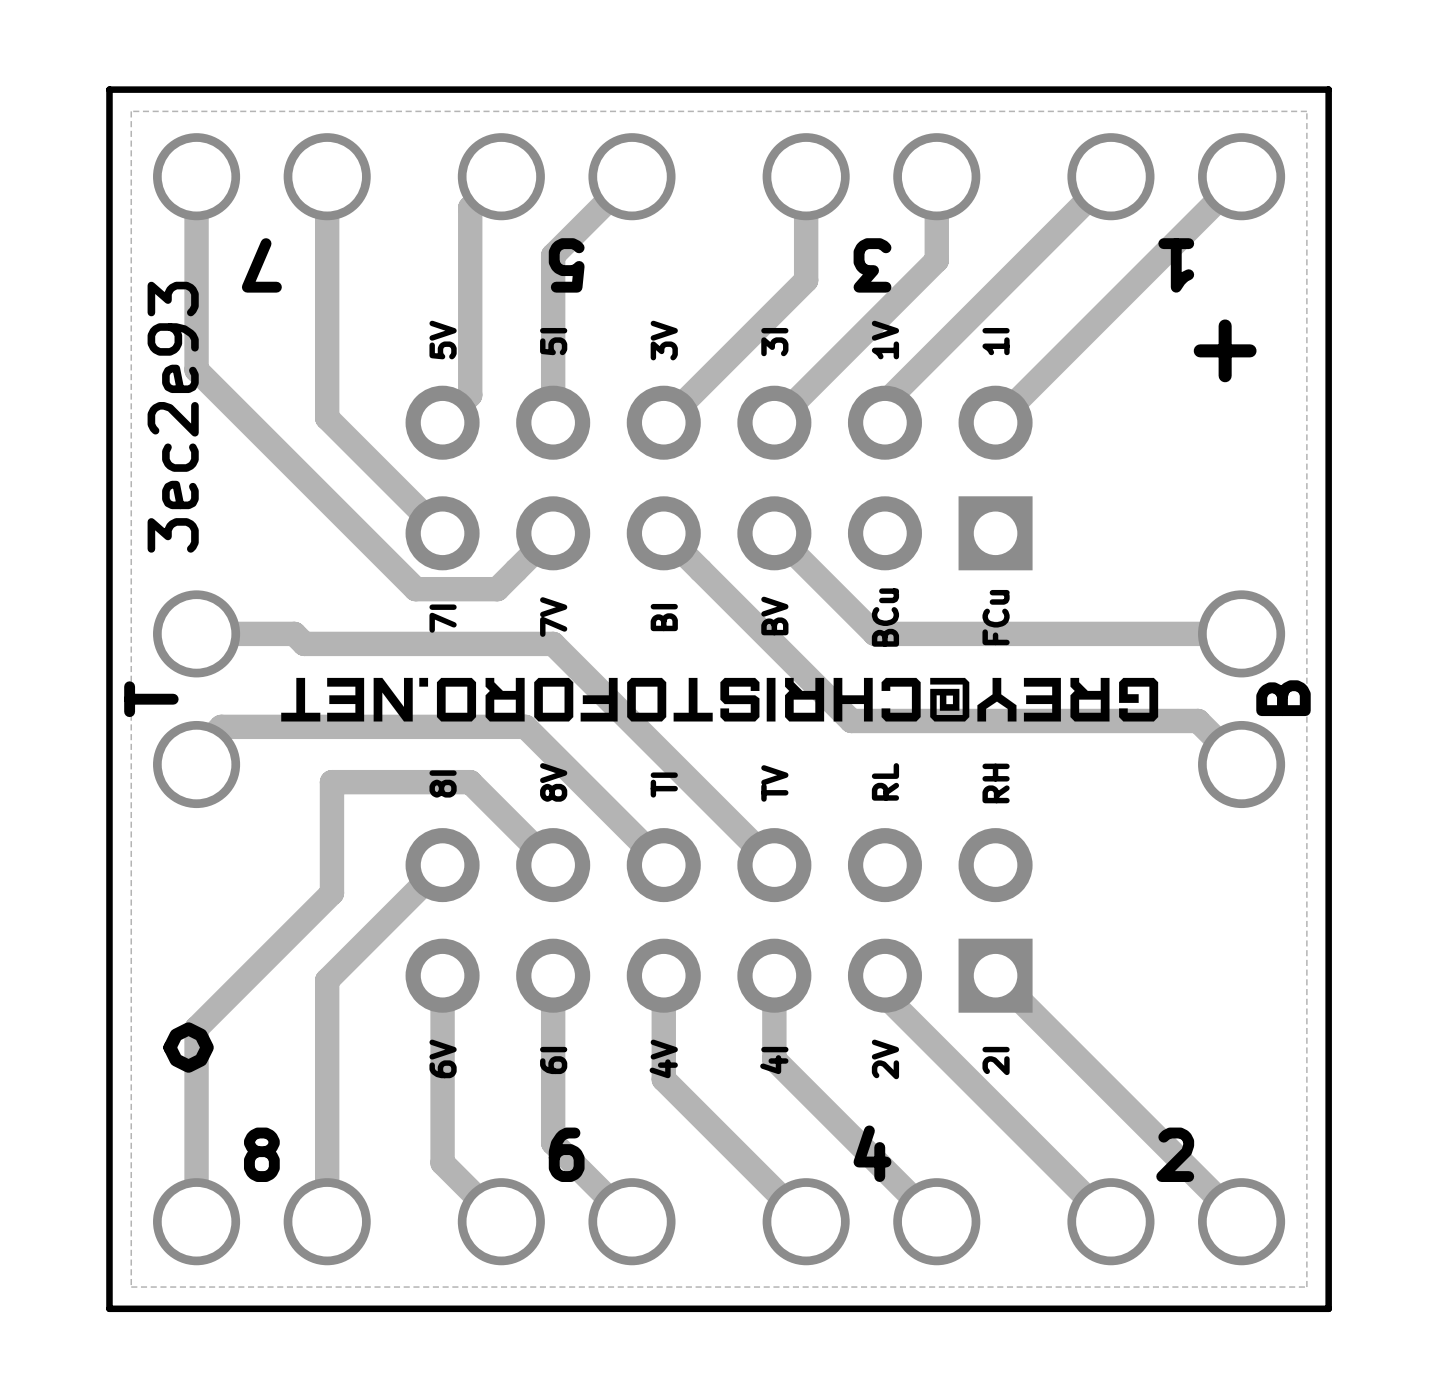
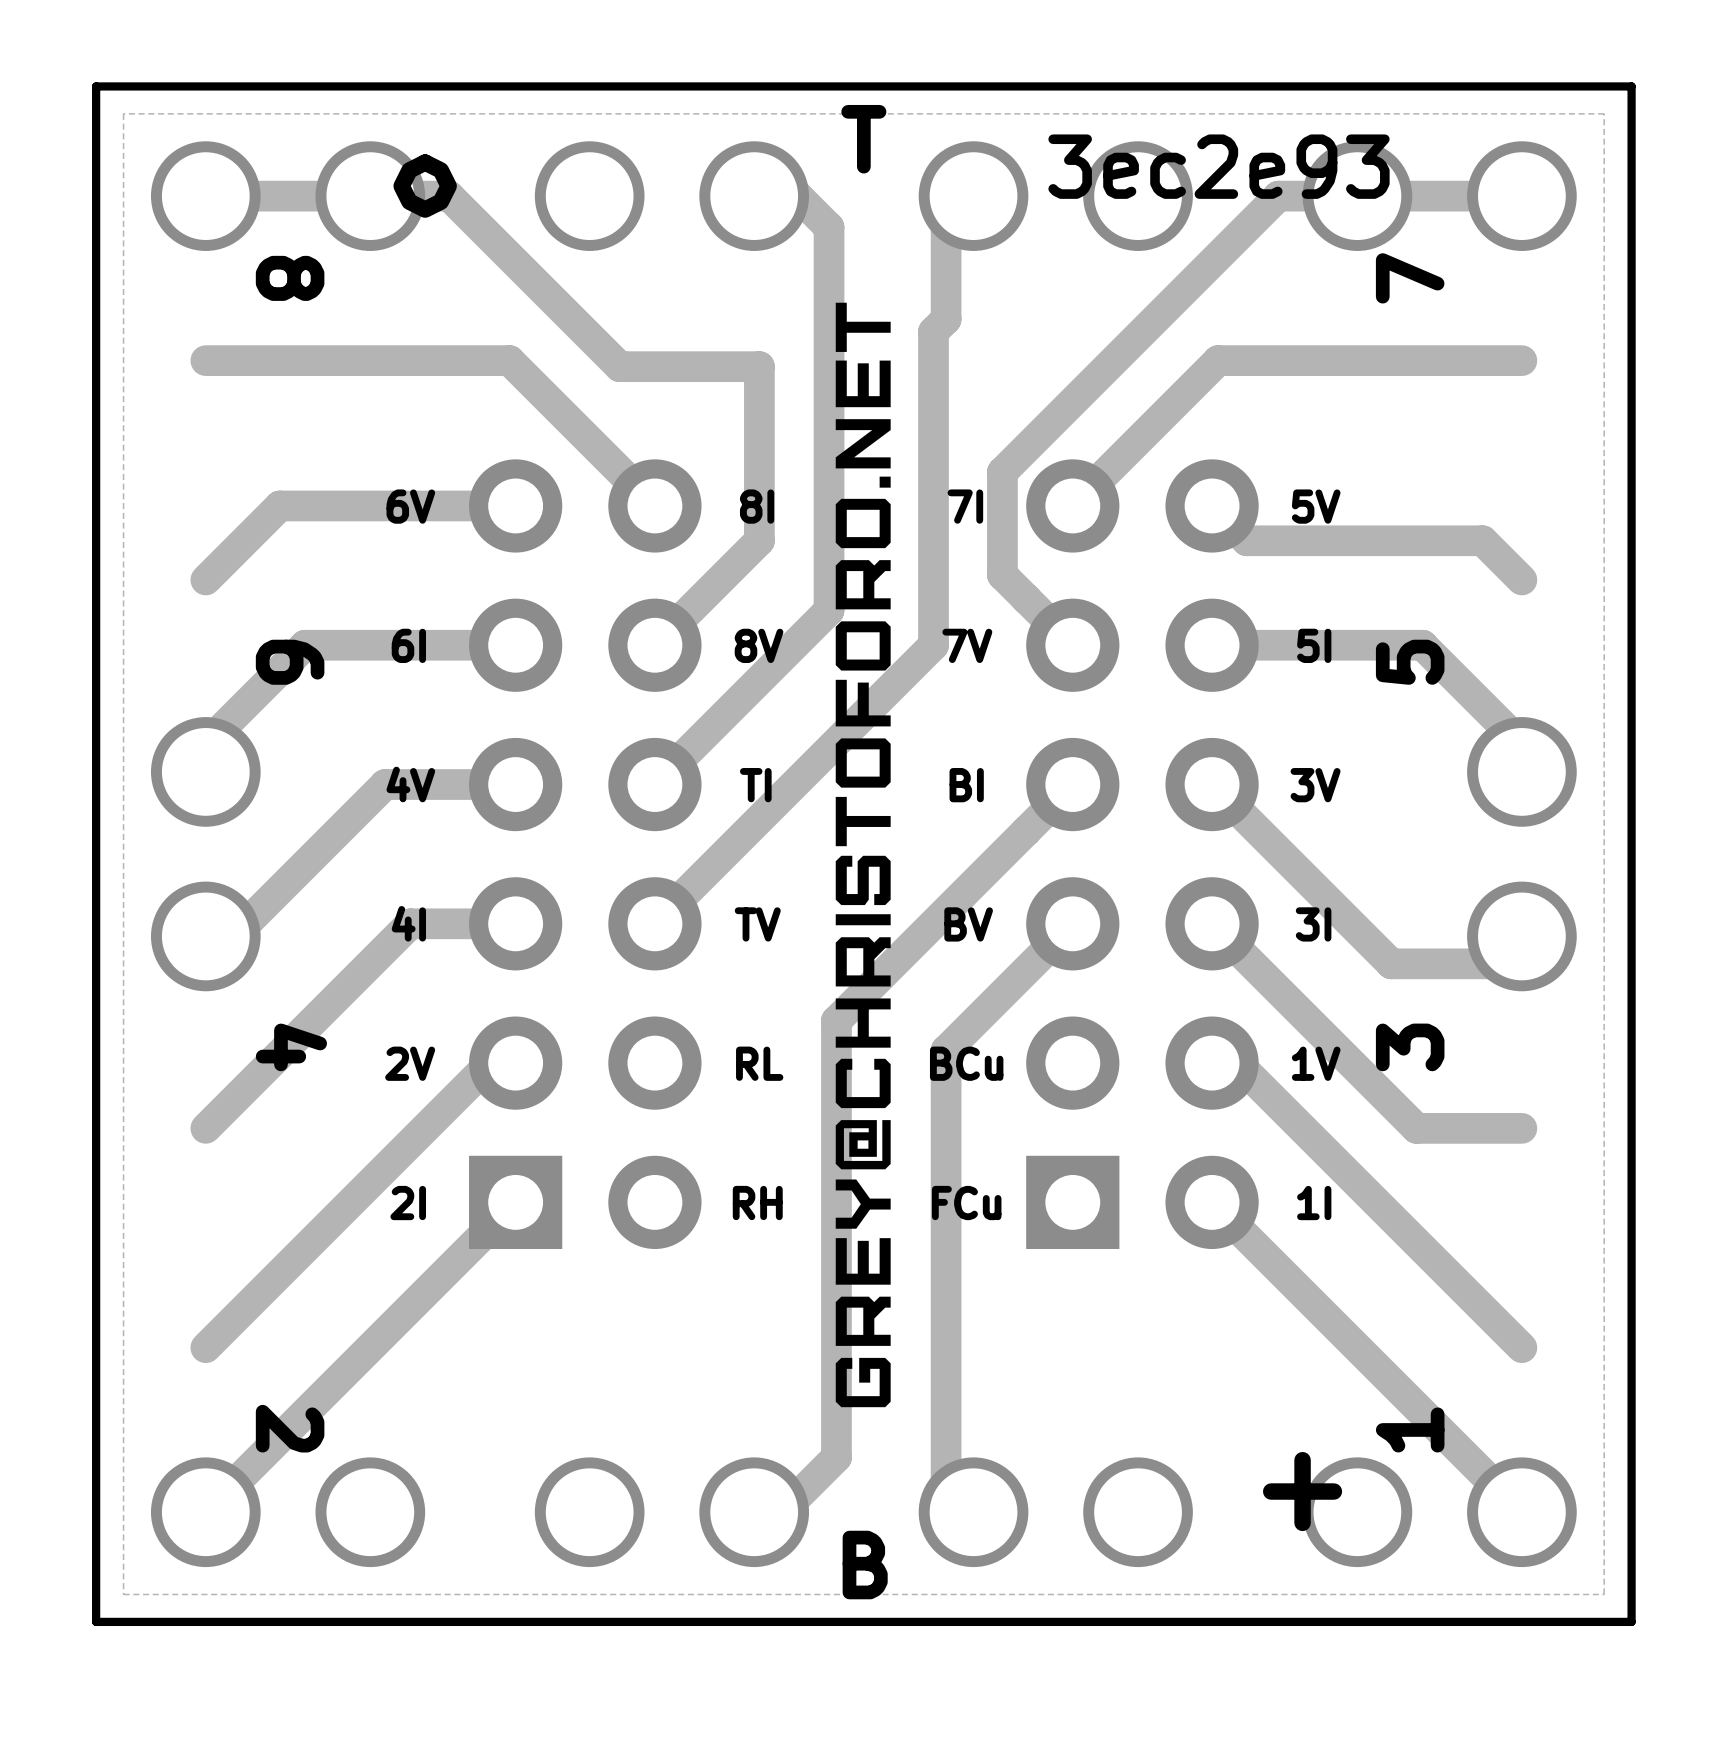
track: (196, 176) (196, 369) (415, 589) (497, 589) (553, 533) -> (205, 196) (449, 196) (619, 366) (759, 366) (759, 540) (654, 645)
track: (327, 176) (327, 417) (442, 533) -> (205, 744) (305, 645) (515, 645)
track: (501, 176) (470, 207) (470, 395) (442, 422) -> (205, 579) (279, 505) (515, 505)
track: (631, 176) (553, 255) (553, 422) -> (205, 360) (509, 360) (654, 505)
track: none -> (781, 196) (797, 196) (829, 227) (829, 610) (654, 784)
track: none -> (946, 196) (946, 319) (933, 331) (933, 645) (654, 923)
track: (806, 176) (806, 280) (663, 422) -> none
track: (936, 176) (936, 260) (774, 422) -> none
track: (1110, 176) (884, 402) (884, 422) -> (1521, 360) (1218, 360) (1072, 505)
track: (1241, 176) (995, 422) -> (1521, 196) (1278, 196) (1002, 472) (1002, 574) (1072, 645)
text: none -> 8 (290, 278)
text rotation: 0° (261, 265) -> 90° clockwise (1410, 278)
text position: 7 (261, 265) -> 7 (1410, 278)
text rotation: 0° (566, 265) -> 90° clockwise (1410, 662)
text position: 5 (566, 265) -> 5 (1410, 662)
text rotation: 0° (872, 265) -> 90° clockwise (1410, 1047)
text position: 3 (872, 265) -> 3 (1410, 1047)
text rotation: 0° (1176, 265) -> 90° clockwise (1410, 1429)
text position: 1 (1176, 265) -> 1 (1410, 1429)
text rotation: 0° (443, 340) -> 90° clockwise (1316, 506)
text position: 5V (443, 340) -> 5V (1316, 506)
text rotation: 0° (664, 340) -> 90° clockwise (1315, 785)
text position: 3V (664, 340) -> 3V (1315, 785)
text rotation: 0° (885, 340) -> 90° clockwise (1316, 1063)
text position: 1V (885, 340) -> 1V (1316, 1063)
text rotation: 0° (553, 341) -> 90° clockwise (1314, 645)
text position: 5I (553, 341) -> 5I (1314, 645)
text rotation: 0° (996, 341) -> 90° clockwise (1314, 1203)
text position: 1I (996, 341) -> 1I (1314, 1203)
text rotation: 0° (774, 342) -> 90° clockwise (1313, 924)
text position: 3I (774, 342) -> 3I (1313, 924)
text rotation: 0° (1225, 350) -> 90° clockwise (1302, 1491)
text position: + (1225, 350) -> + (1302, 1491)
text rotation: 0° (173, 417) -> 90° clockwise (1218, 166)
text position: 3ec2e93 (173, 417) -> 3ec2e93 (1218, 166)
track: none -> (1212, 505) (1246, 540) (1482, 540) (1521, 579)
part: (719, 478) -> none
track: (663, 533) (851, 720) (1198, 720) (1241, 764) -> none
track: (774, 533) (874, 633) (1241, 633) -> none
track: none -> (1212, 645) (1422, 645) (1521, 744)
text rotation: 0° (774, 616) -> 90° clockwise (968, 924)
text position: BV (774, 616) -> BV (968, 924)
text rotation: 0° (553, 617) -> 90° clockwise (967, 645)
text position: 7V (553, 617) -> 7V (967, 645)
text rotation: 0° (664, 617) -> 90° clockwise (966, 785)
text position: BI (664, 617) -> BI (966, 785)
text rotation: 0° (885, 617) -> 90° clockwise (966, 1063)
text position: BCu (885, 617) -> BCu (966, 1063)
text rotation: 0° (996, 617) -> 90° clockwise (966, 1203)
text position: FCu (996, 617) -> FCu (966, 1203)
text rotation: 0° (443, 618) -> 90° clockwise (965, 506)
text position: 7I (443, 618) -> 7I (965, 506)
track: (196, 633) (294, 633) (304, 643) (338, 643) -> (205, 963) (385, 784)
track: (442, 643) (553, 643) (774, 865) -> none
track: none -> (1072, 784) (836, 1020) (836, 1457) (781, 1512)
track: none -> (1212, 784) (1391, 963) (1521, 963)
drawing shape: [281, 677, 1159, 722] -> [835, 302, 891, 1408]
text rotation: 0° (1283, 698) -> 90° clockwise (865, 1565)
text position: B (1283, 698) -> B (865, 1565)
text rotation: 0° (151, 699) -> 90° clockwise (863, 139)
text position: T (151, 699) -> T (863, 139)
part: none -> (585, 854)
part: none -> (1142, 854)
track: none -> (515, 923) (410, 923) (205, 1128)
track: none -> (1072, 923) (946, 1050) (946, 1512)
track: none -> (1212, 923) (1416, 1128) (1521, 1128)
track: (196, 764) (196, 751) (221, 726) (525, 726) (663, 865) -> none
text rotation: 0° (885, 781) -> 90° clockwise (759, 1063)
text position: RL (885, 781) -> RL (759, 1063)
text rotation: 0° (553, 782) -> 90° clockwise (759, 645)
text position: 8V (553, 782) -> 8V (759, 645)
text rotation: 0° (443, 783) -> 90° clockwise (757, 506)
text position: 8I (443, 783) -> 8I (757, 506)
text rotation: 0° (774, 783) -> 90° clockwise (757, 924)
text position: TV (774, 783) -> TV (757, 924)
text rotation: 0° (996, 783) -> 90° clockwise (757, 1203)
text position: RH (996, 783) -> RH (757, 1203)
text rotation: 0° (664, 785) -> 90° clockwise (755, 785)
text position: TI (664, 785) -> TI (755, 785)
track: (442, 865) (327, 980) (327, 1221) -> (515, 1063) (490, 1063) (205, 1347)
track: (553, 865) (470, 782) (331, 782) (331, 893) (196, 1028) (196, 1221) -> (515, 1202) (205, 1512)
track: none -> (1212, 1063) (1237, 1063) (1521, 1347)
part: (719, 920) -> none
track: (442, 975) (442, 1162) (501, 1221) -> none
track: (553, 975) (553, 1142) (631, 1221) -> none
track: (663, 975) (663, 1079) (806, 1221) -> none
track: (774, 975) (774, 1059) (936, 1221) -> none
track: (884, 975) (884, 995) (1110, 1221) -> none
text rotation: 0° (188, 1047) -> 90° clockwise (425, 186)
text position: ° (188, 1047) -> ° (425, 186)
text rotation: 0° (443, 1058) -> 90° clockwise (410, 506)
text position: 6V (443, 1058) -> 6V (410, 506)
text rotation: 0° (663, 1058) -> 90° clockwise (410, 784)
text position: 4V (663, 1058) -> 4V (410, 784)
text rotation: 0° (885, 1059) -> 90° clockwise (410, 1063)
text position: 2V (885, 1059) -> 2V (410, 1063)
text rotation: 0° (553, 1060) -> 90° clockwise (408, 645)
text position: 6I (553, 1060) -> 6I (408, 645)
text rotation: 0° (774, 1060) -> 90° clockwise (408, 923)
text position: 4I (774, 1060) -> 4I (408, 923)
text rotation: 0° (996, 1060) -> 90° clockwise (408, 1203)
text position: 2I (996, 1060) -> 2I (408, 1203)
text rotation: 0° (872, 1153) -> 90° clockwise (291, 1047)
text position: 4 (872, 1153) -> 4 (291, 1047)
text: 8 (261, 1154) -> 2 (290, 1428)
text rotation: 0° (566, 1154) -> 90° clockwise (290, 662)
text position: 6 (566, 1154) -> 6 (290, 662)
text: 2 (1175, 1154) -> none

